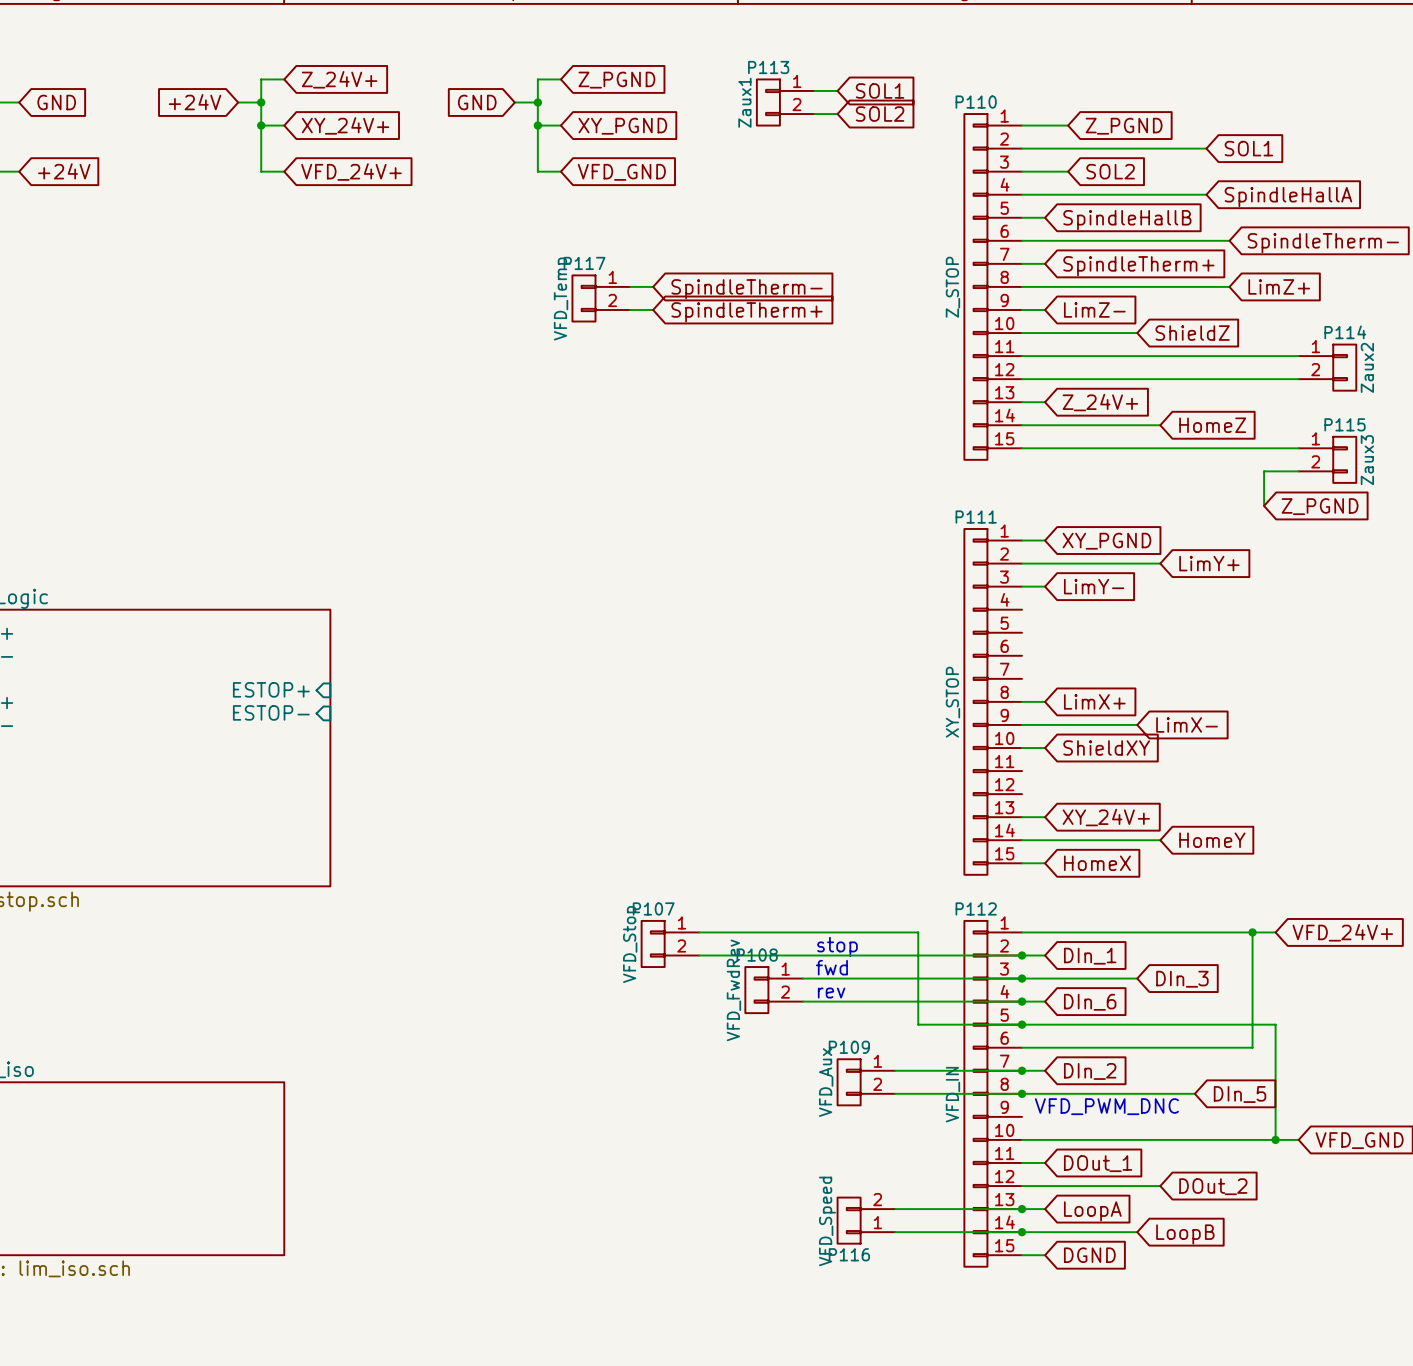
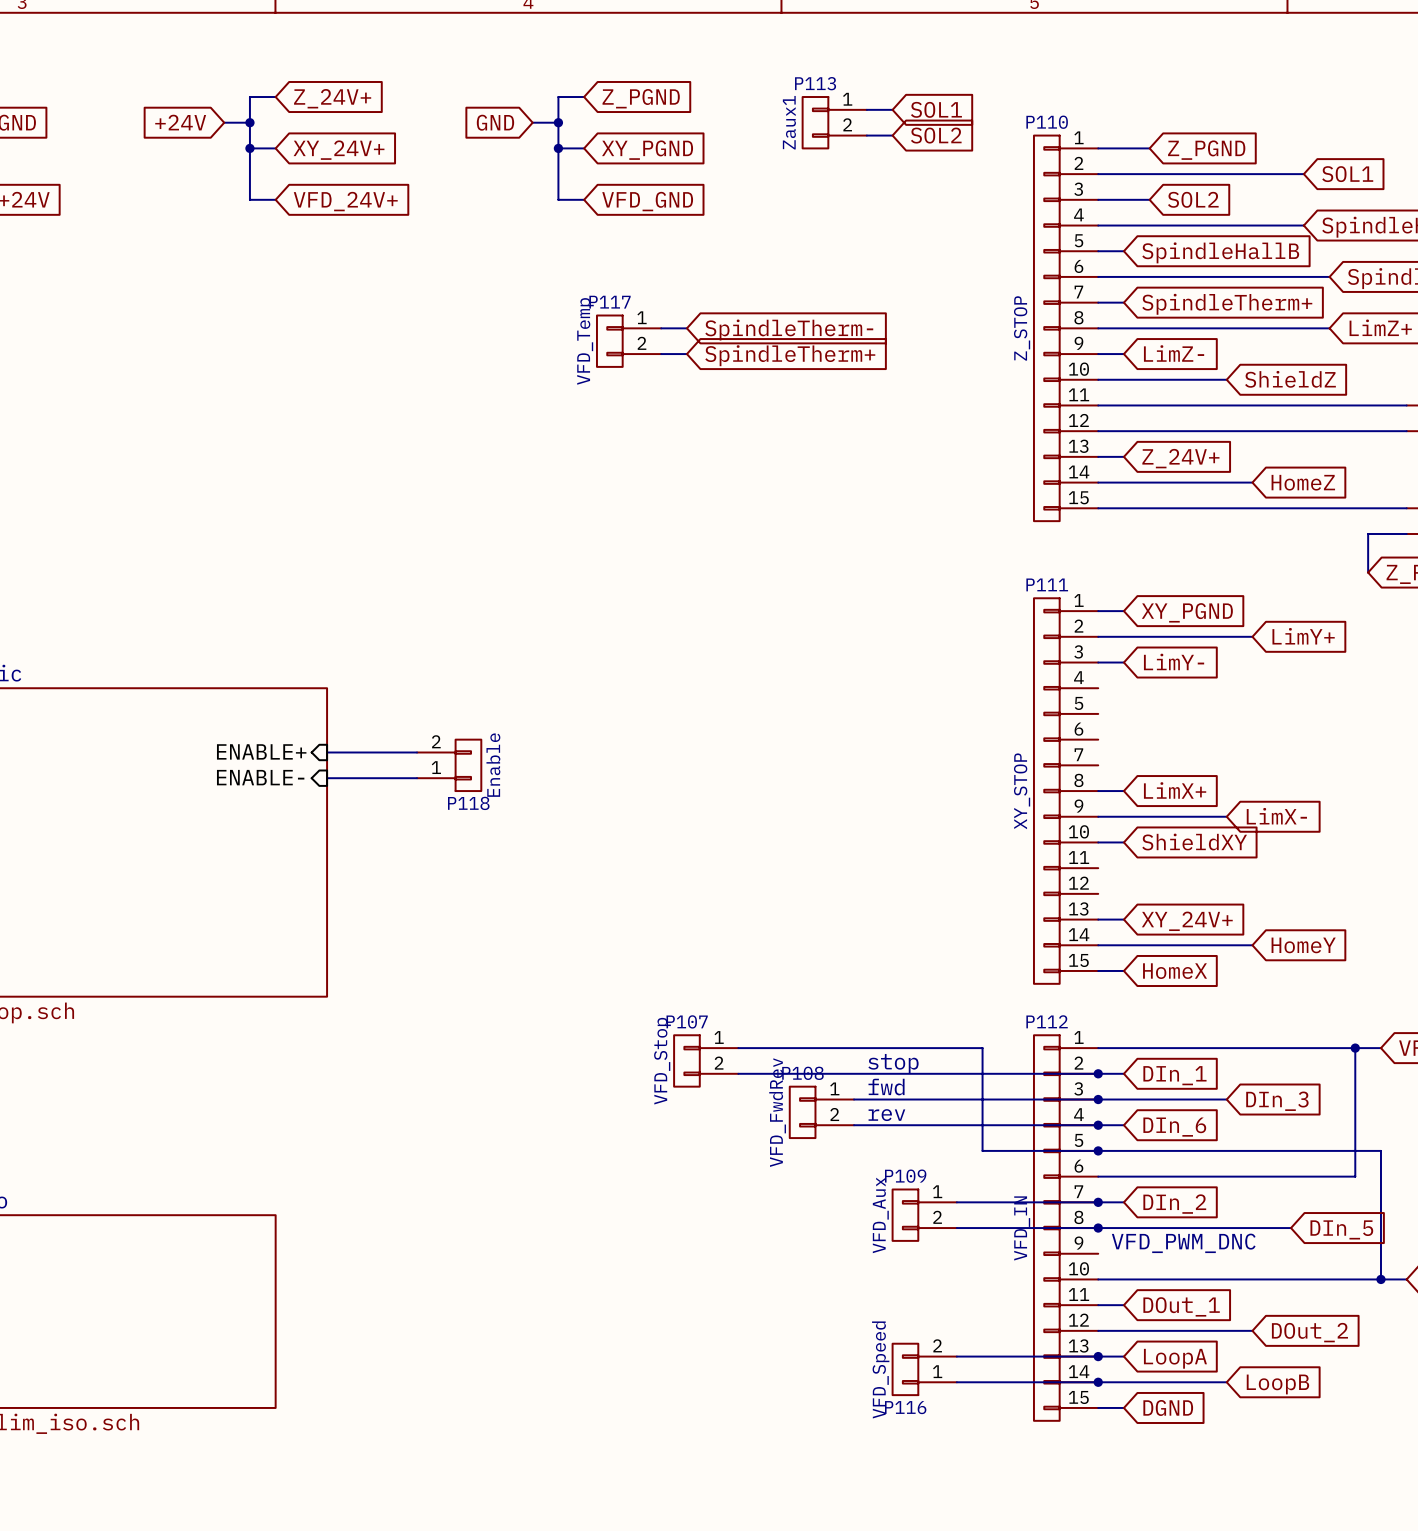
sheet pin: none -> ENABLE+ (261, 751)
wire: none -> (327, 752) (417, 752)
P118: none -> Enable (449, 765)
sheet pin: ESTOP+ (271, 689) -> ENABLE- (260, 777)
wire: none -> (327, 778) (417, 778)
sheet pin: ESTOP- (271, 712) -> none

